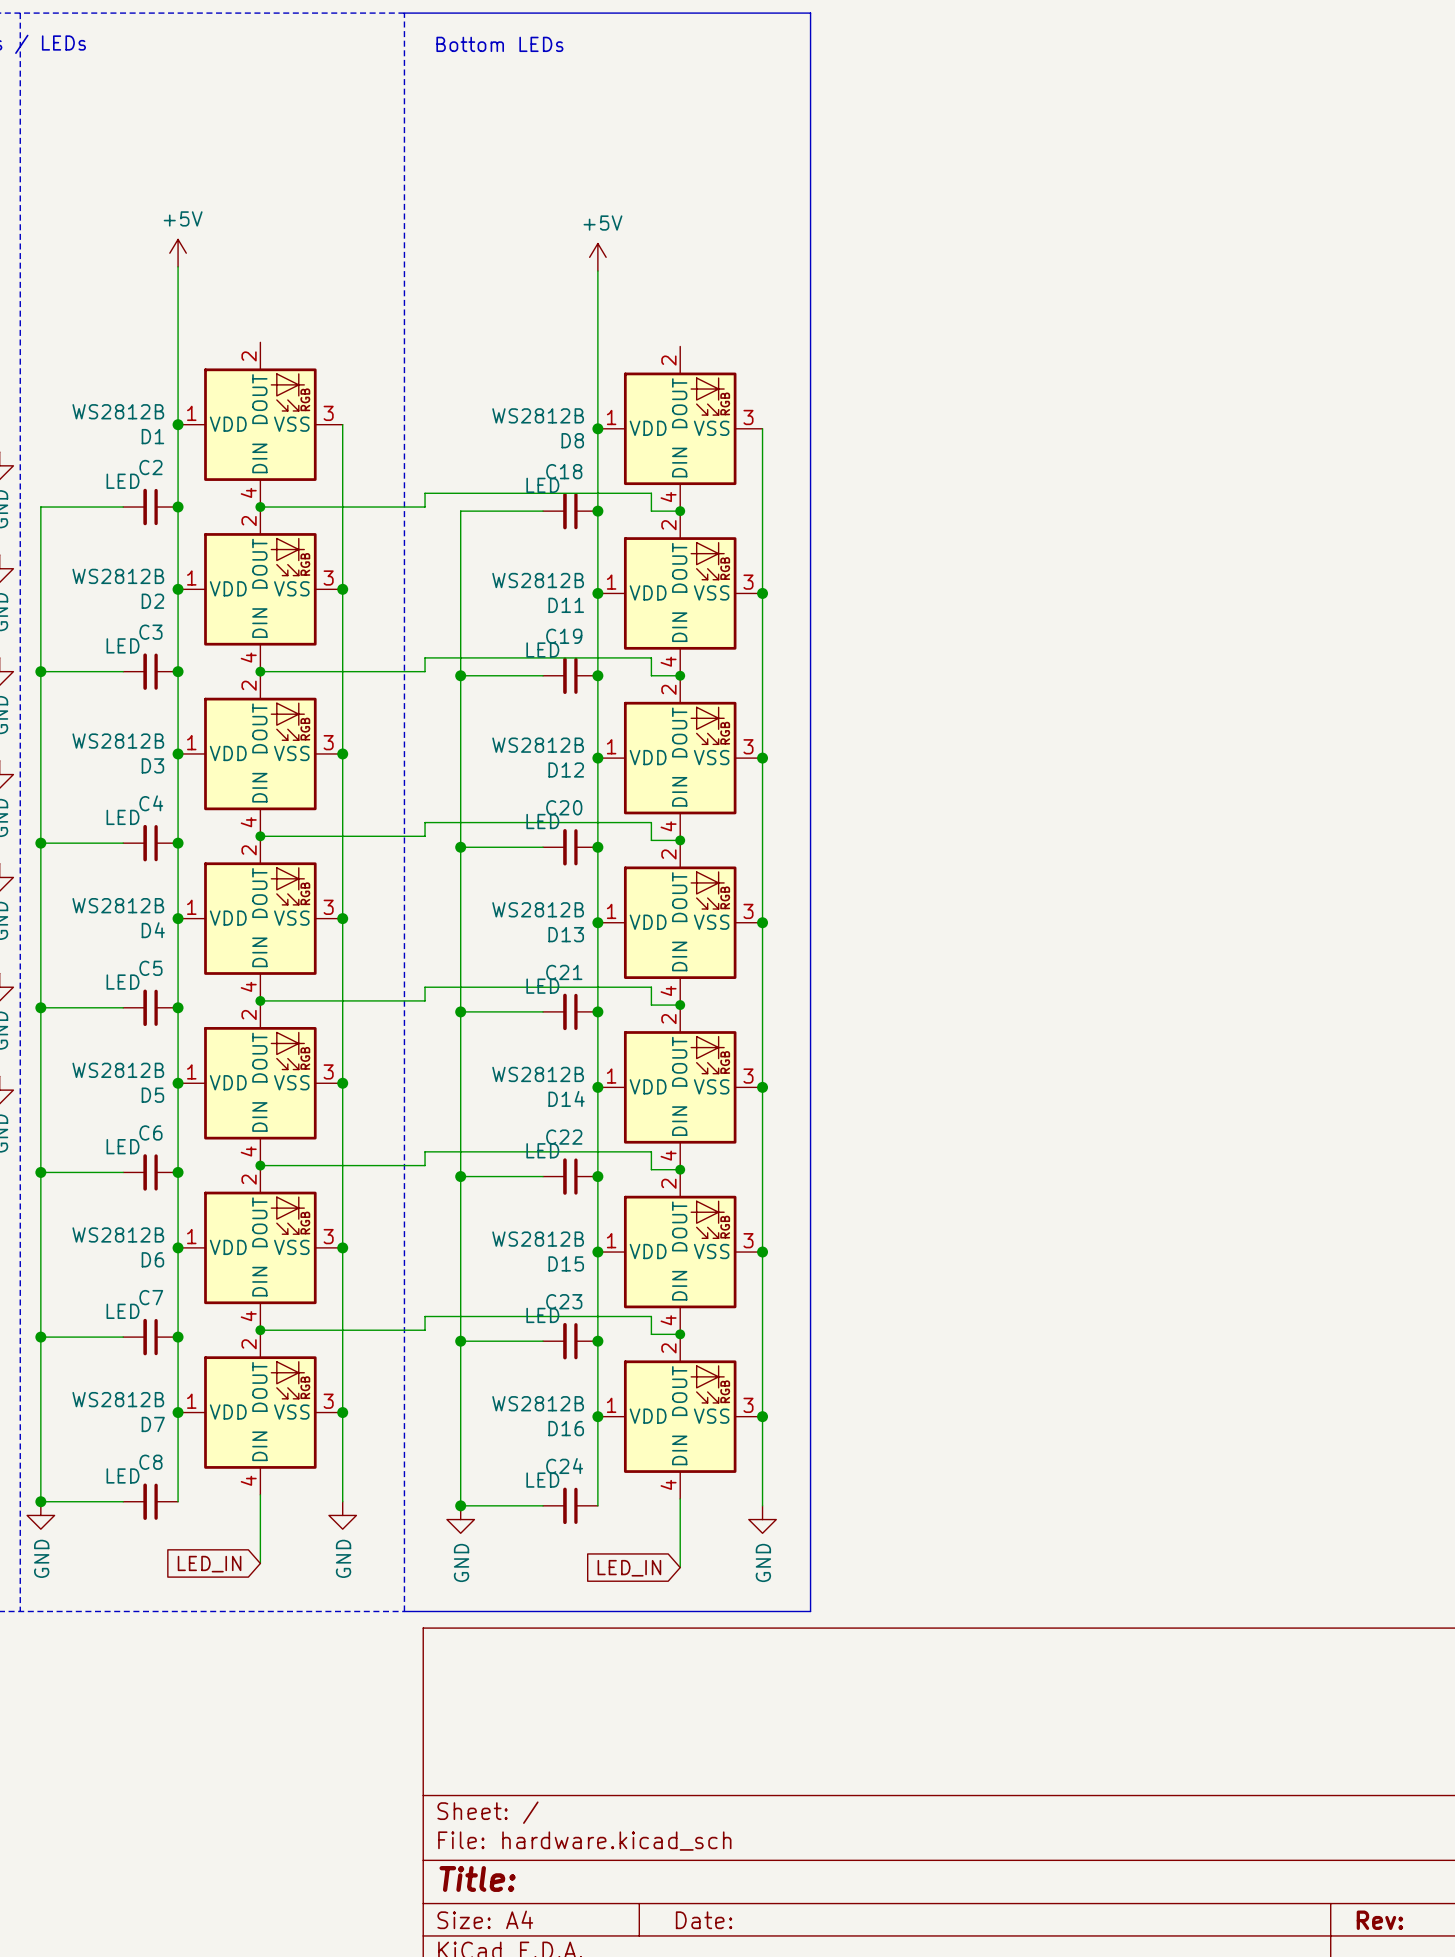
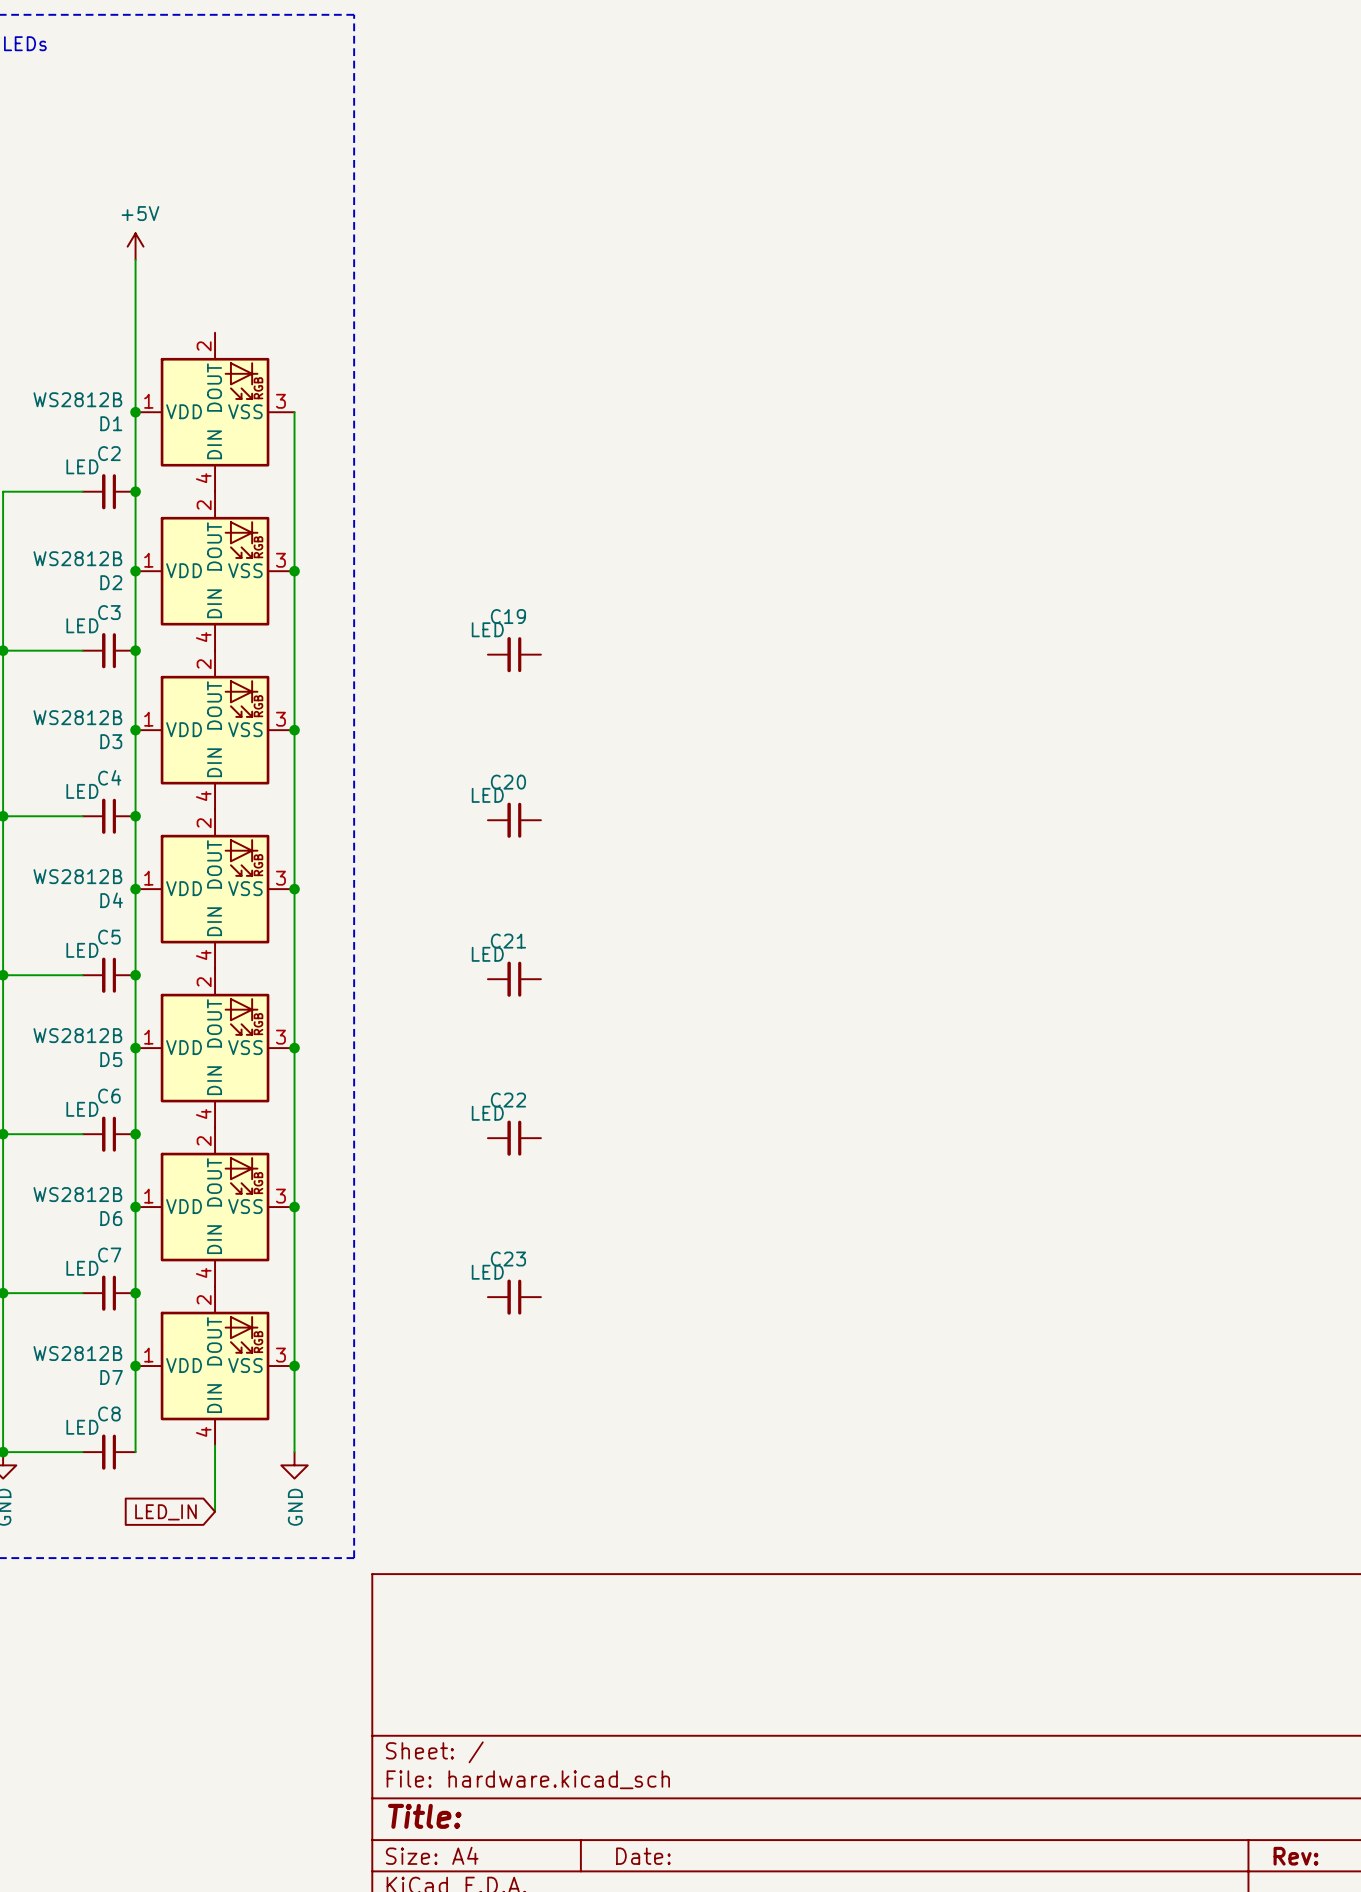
line: (404, 13) (810, 13) (810, 1611) (404, 1611) -> none
text: Bottom LEDs (499, 44) -> none
power symbol: +5V (597, 257) -> none
wire: (597, 271) (597, 1505) -> none
junction: (597, 428) -> none
D8: WS2812B (680, 428) -> none
wire: (762, 428) (762, 1505) -> none
wire: (260, 507) (425, 507) (425, 493) (651, 493) (651, 511) (680, 511) -> none
junction: (260, 507) -> none
wire: (543, 511) (460, 511) (460, 1505) (543, 1505) -> none
C18: LED (570, 511) -> none
junction: (597, 511) -> none
junction: (680, 511) -> none
junction: (597, 593) -> none
D11: WS2812B (680, 593) -> none
junction: (762, 593) -> none
wire: (260, 671) (425, 671) (425, 657) (651, 657) (651, 675) (680, 675) -> none
junction: (260, 671) -> none
wire: (460, 675) (543, 675) -> none
junction: (460, 675) -> none
junction: (597, 675) -> none
junction: (680, 675) -> none
junction: (597, 758) -> none
D12: WS2812B (680, 758) -> none
junction: (762, 758) -> none
wire: (260, 836) (425, 836) (425, 822) (651, 822) (651, 840) (680, 840) -> none
junction: (260, 836) -> none
junction: (680, 840) -> none
wire: (460, 847) (543, 847) -> none
junction: (460, 847) -> none
junction: (597, 847) -> none
junction: (597, 922) -> none
D13: WS2812B (680, 922) -> none
junction: (762, 922) -> none
wire: (260, 1000) (425, 1000) (425, 987) (651, 987) (651, 1005) (680, 1005) -> none
junction: (260, 1000) -> none
junction: (680, 1005) -> none
wire: (460, 1011) (543, 1011) -> none
junction: (460, 1011) -> none
junction: (597, 1011) -> none
junction: (597, 1087) -> none
D14: WS2812B (680, 1087) -> none
junction: (762, 1087) -> none
wire: (260, 1165) (425, 1165) (425, 1151) (651, 1151) (651, 1169) (680, 1169) -> none
junction: (260, 1165) -> none
junction: (680, 1169) -> none
wire: (460, 1176) (543, 1176) -> none
junction: (460, 1176) -> none
junction: (597, 1176) -> none
junction: (597, 1252) -> none
D15: WS2812B (680, 1252) -> none
junction: (762, 1252) -> none
wire: (260, 1330) (425, 1330) (425, 1316) (651, 1316) (651, 1334) (680, 1334) -> none
junction: (260, 1330) -> none
junction: (680, 1334) -> none
wire: (460, 1341) (543, 1341) -> none
junction: (460, 1341) -> none
junction: (597, 1341) -> none
junction: (597, 1416) -> none
D16: WS2812B (680, 1416) -> none
junction: (762, 1416) -> none
wire: (680, 1498) (680, 1567) -> none
junction: (460, 1505) -> none
C24: LED (570, 1505) -> none
power symbol: GND (460, 1519) -> none
power symbol: GND (762, 1519) -> none
global label: LED_IN (629, 1568) -> none

